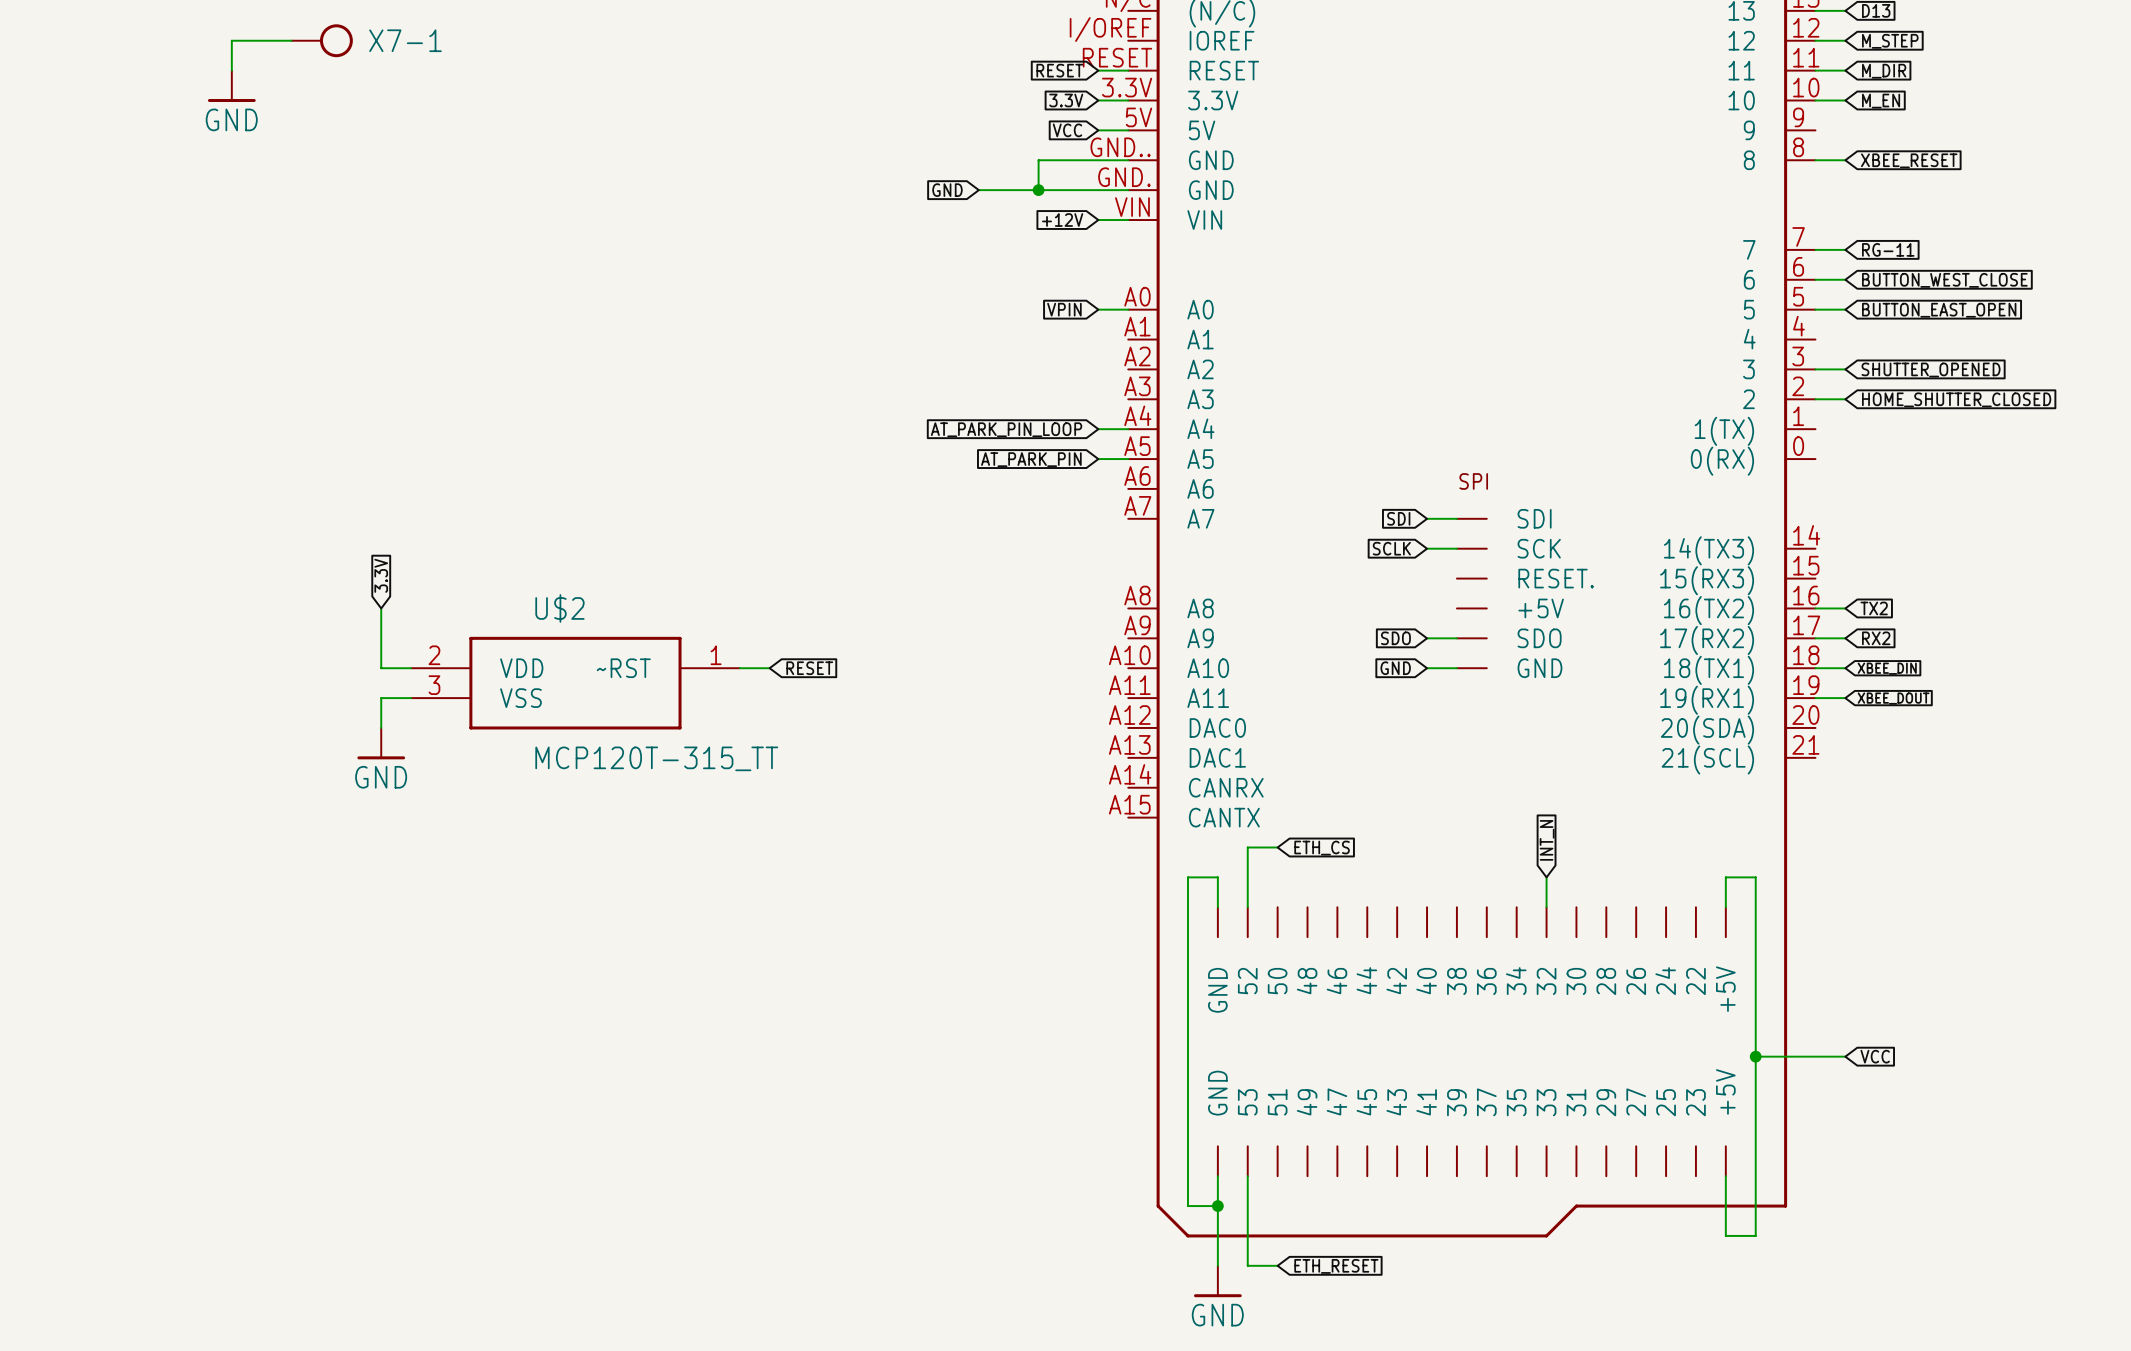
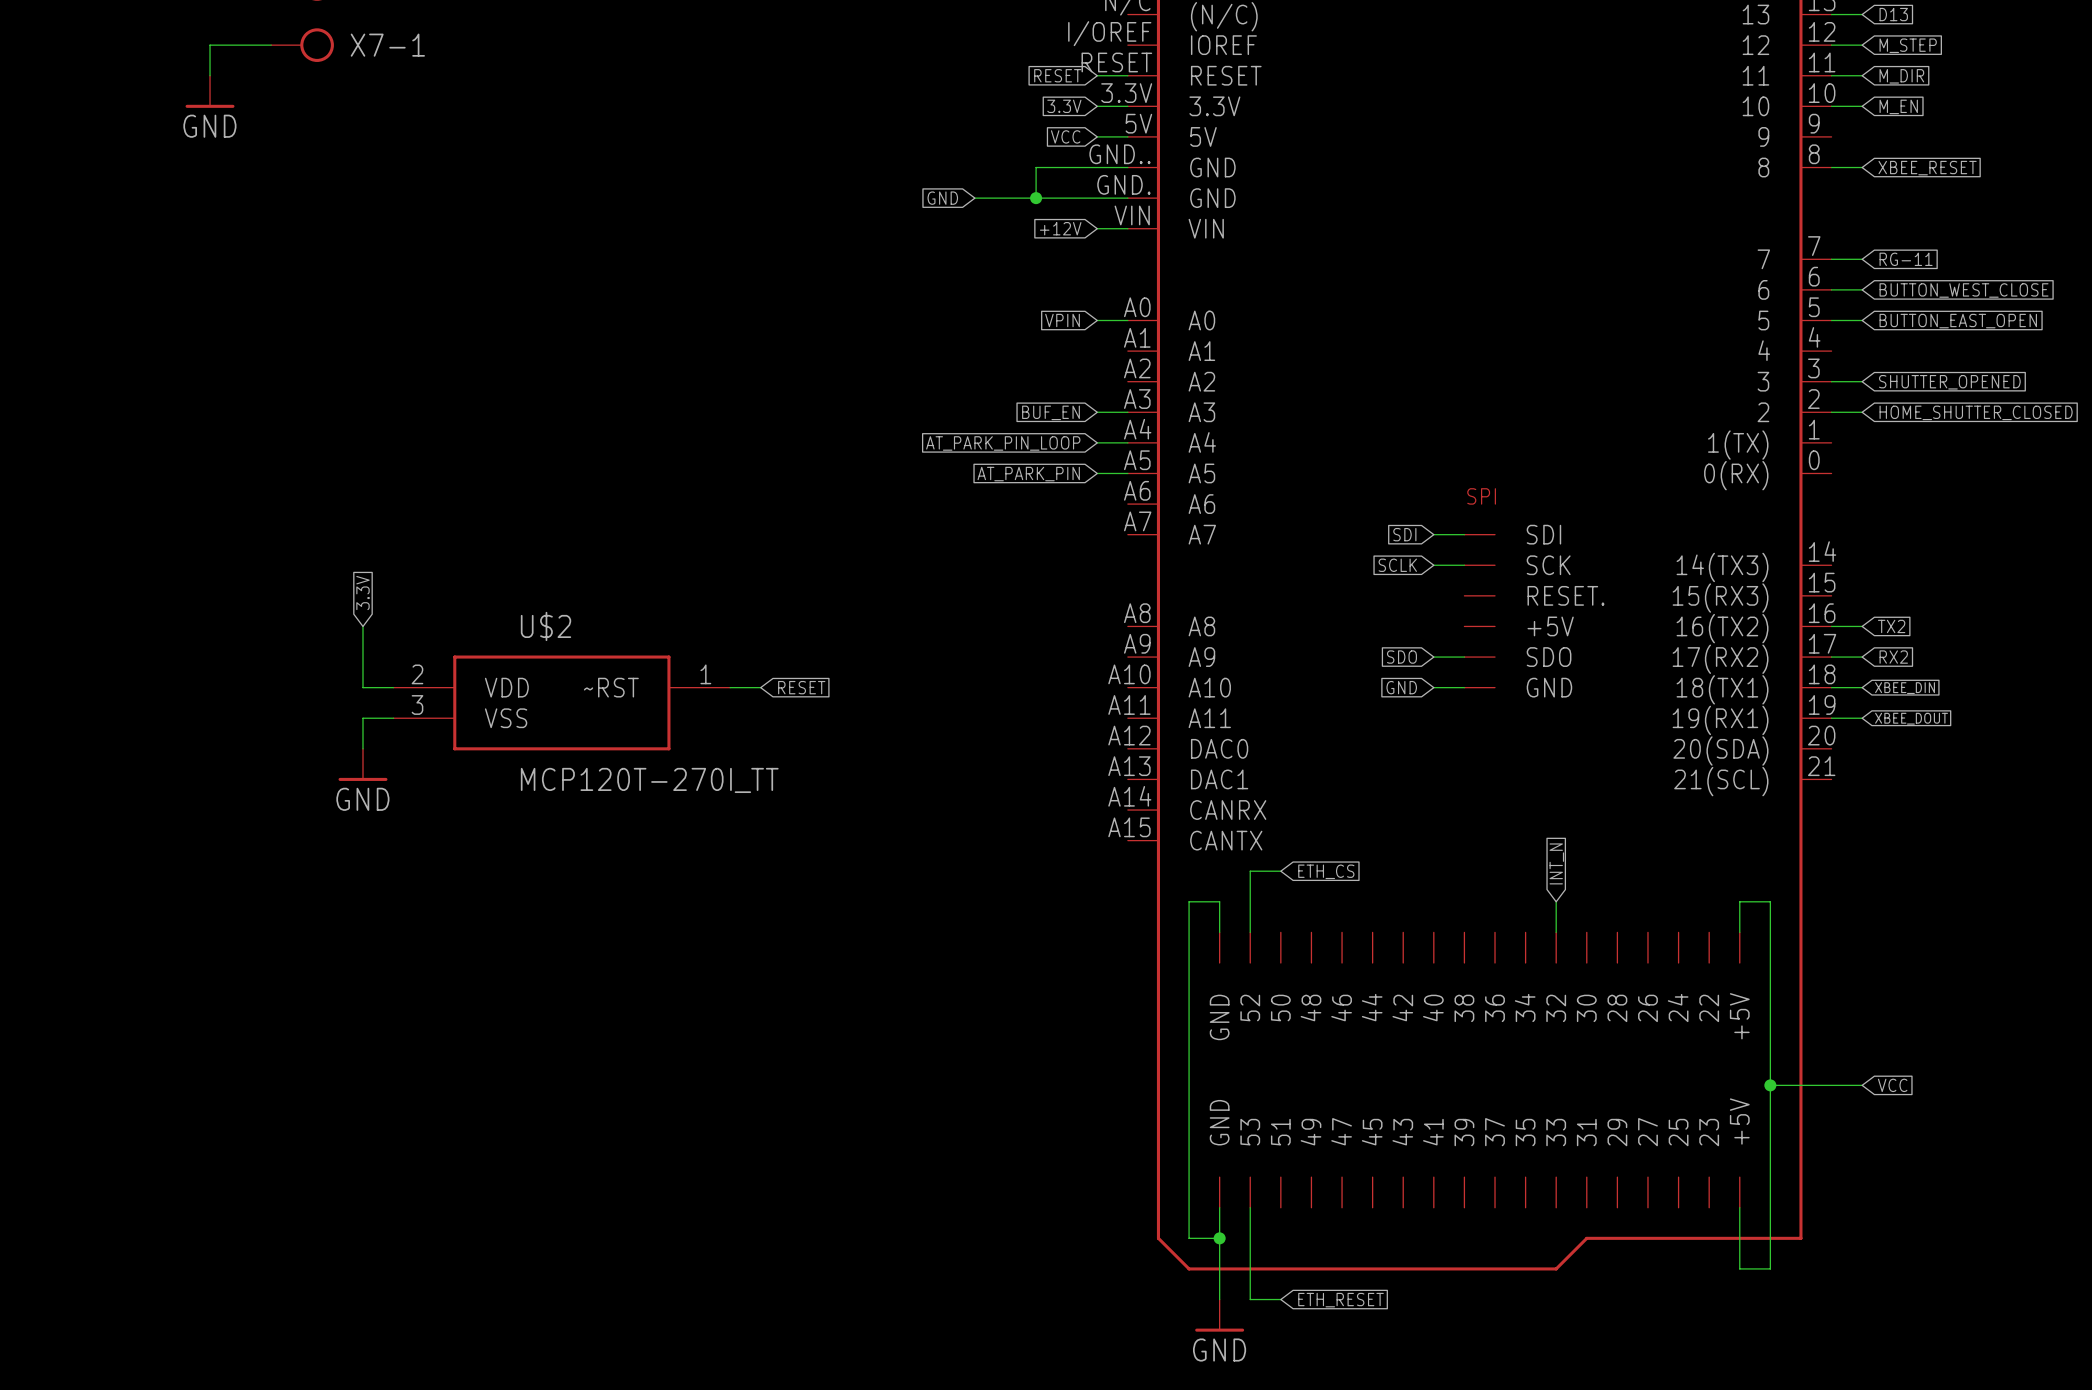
global label: none -> BUF_EN (1051, 412)
wire: none -> (1097, 412) (1127, 412)
U$2 value: MCP120T-315_TT (656, 758) -> MCP120T-270I_TT (649, 780)

